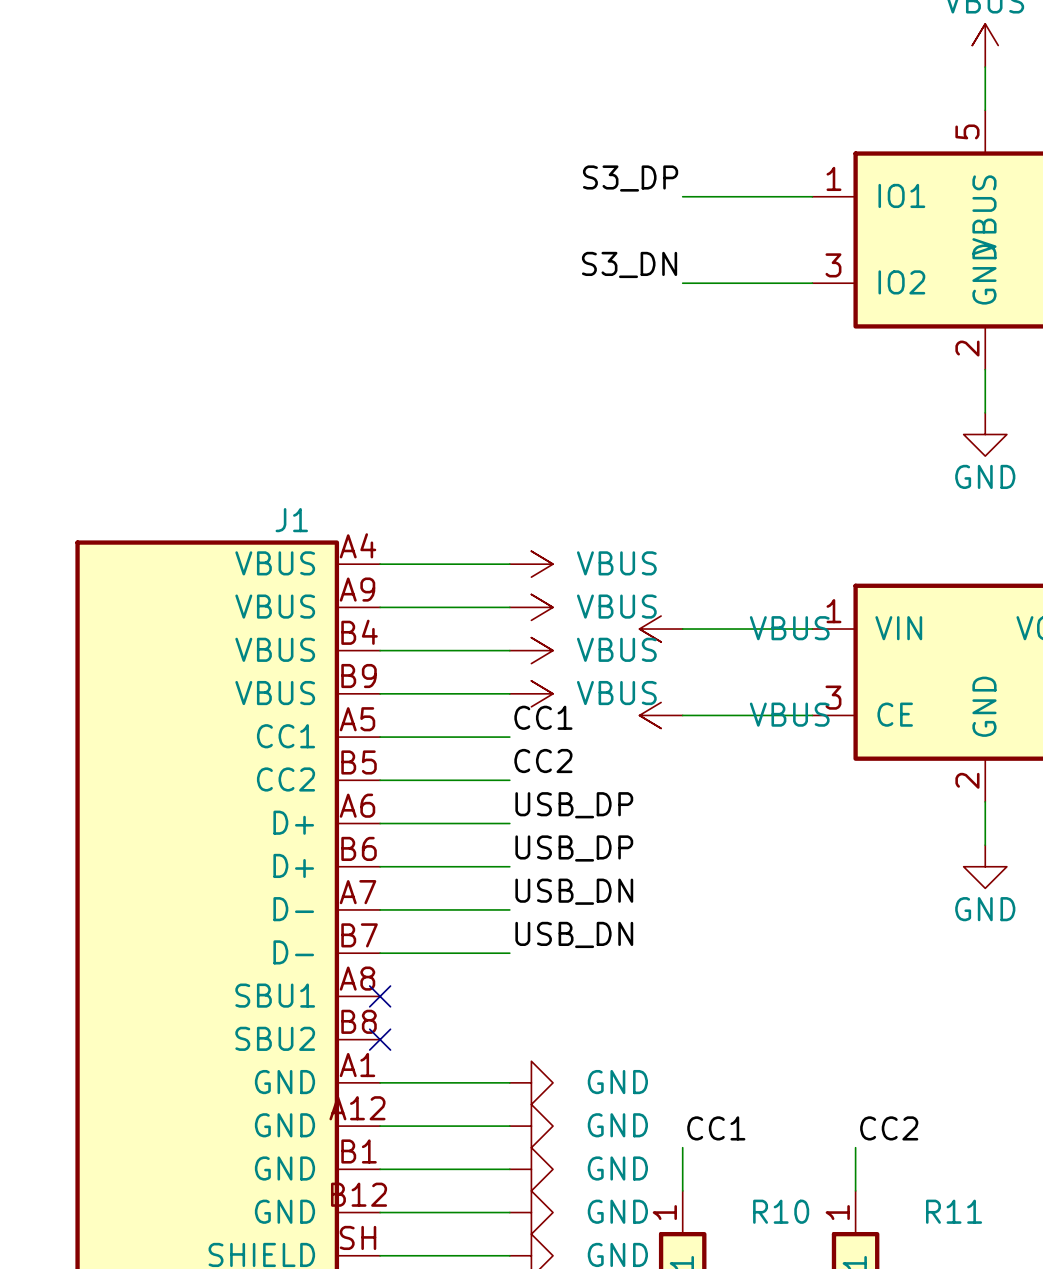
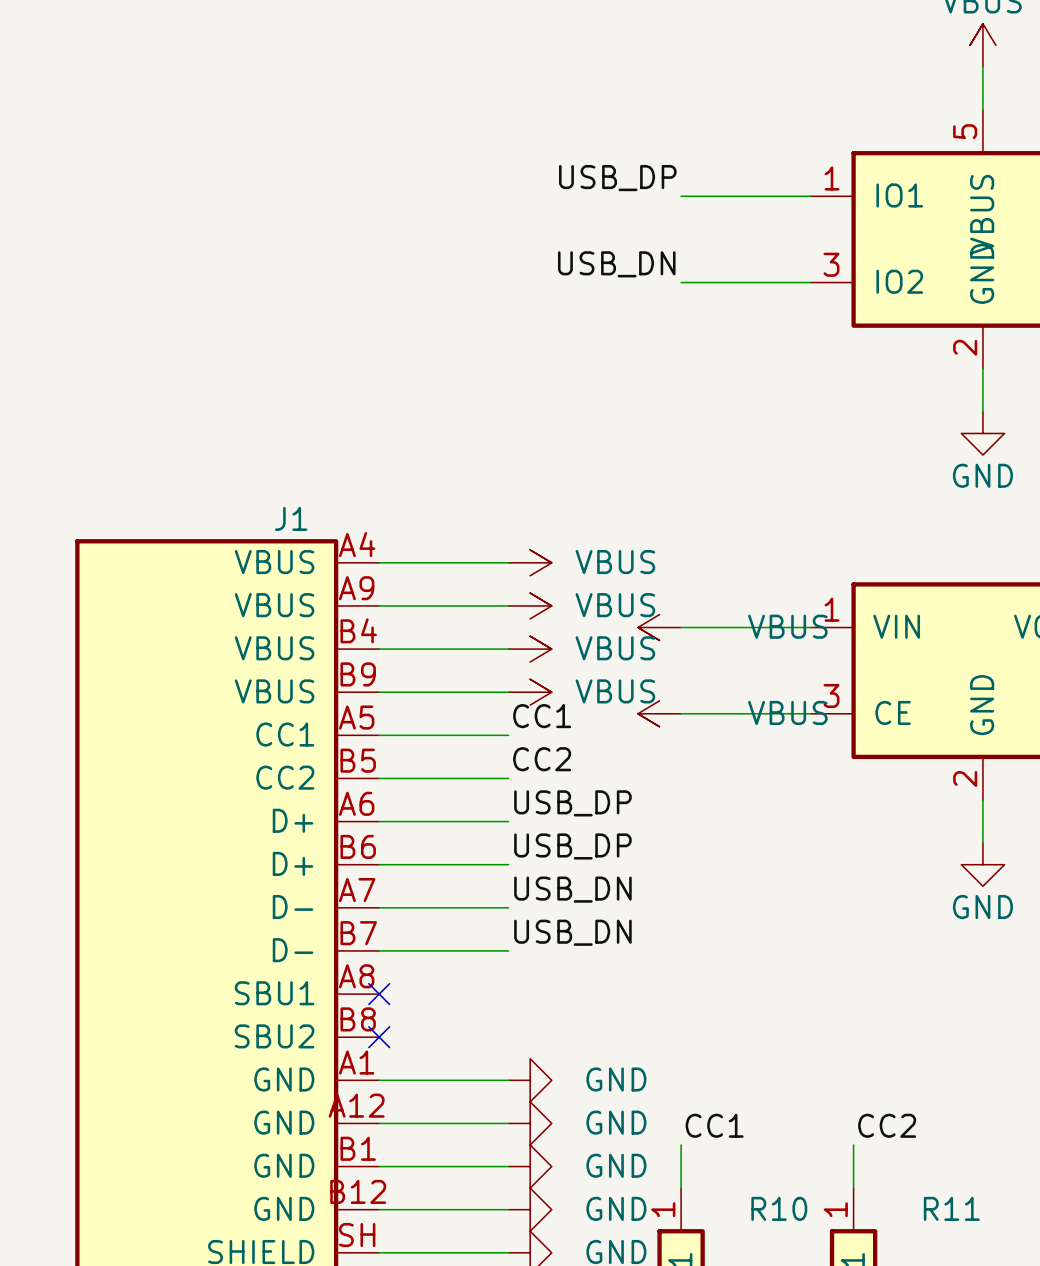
label: S3_DP (630, 178) -> USB_DP (617, 178)
label: S3_DN (629, 264) -> USB_DN (616, 264)

